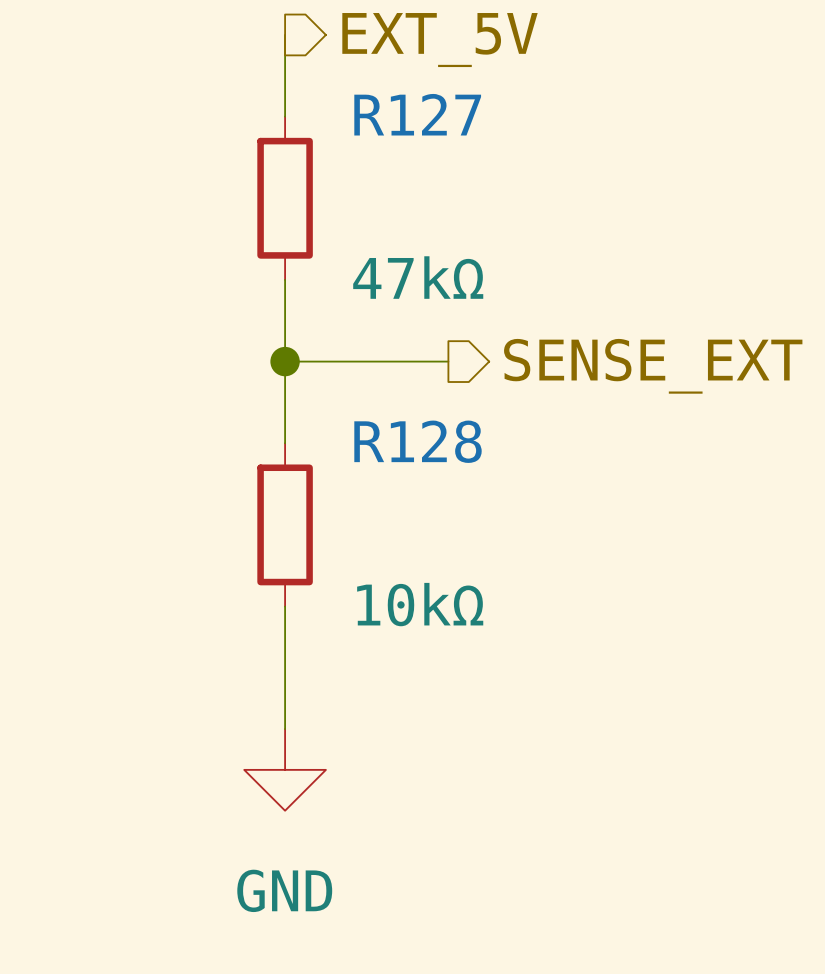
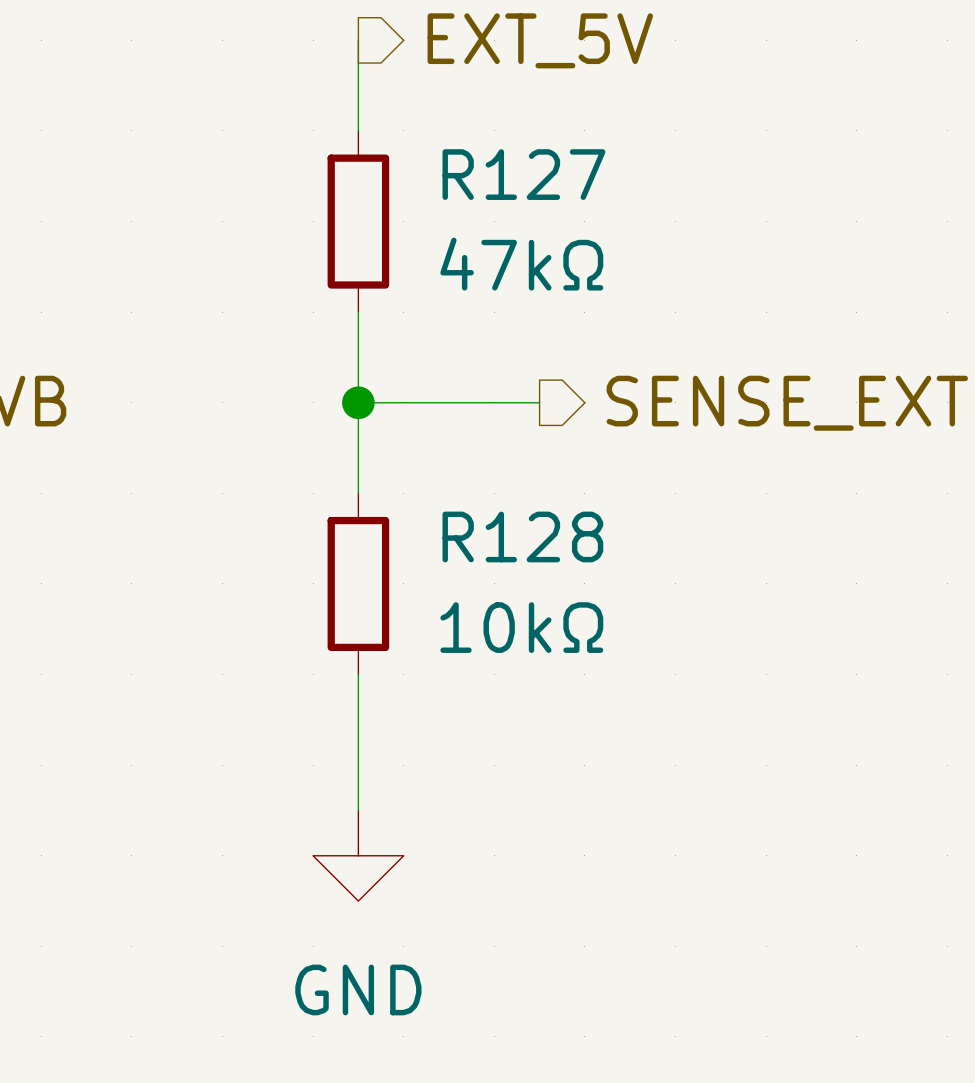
R127 name position: R127 (417, 114) -> R127 (523, 174)
R127 value position: 47kΩ (418, 277) -> 47kΩ (521, 264)
R128 name position: R128 (418, 441) -> R128 (522, 536)
R128 value position: 10kΩ (420, 604) -> 10kΩ (521, 627)

